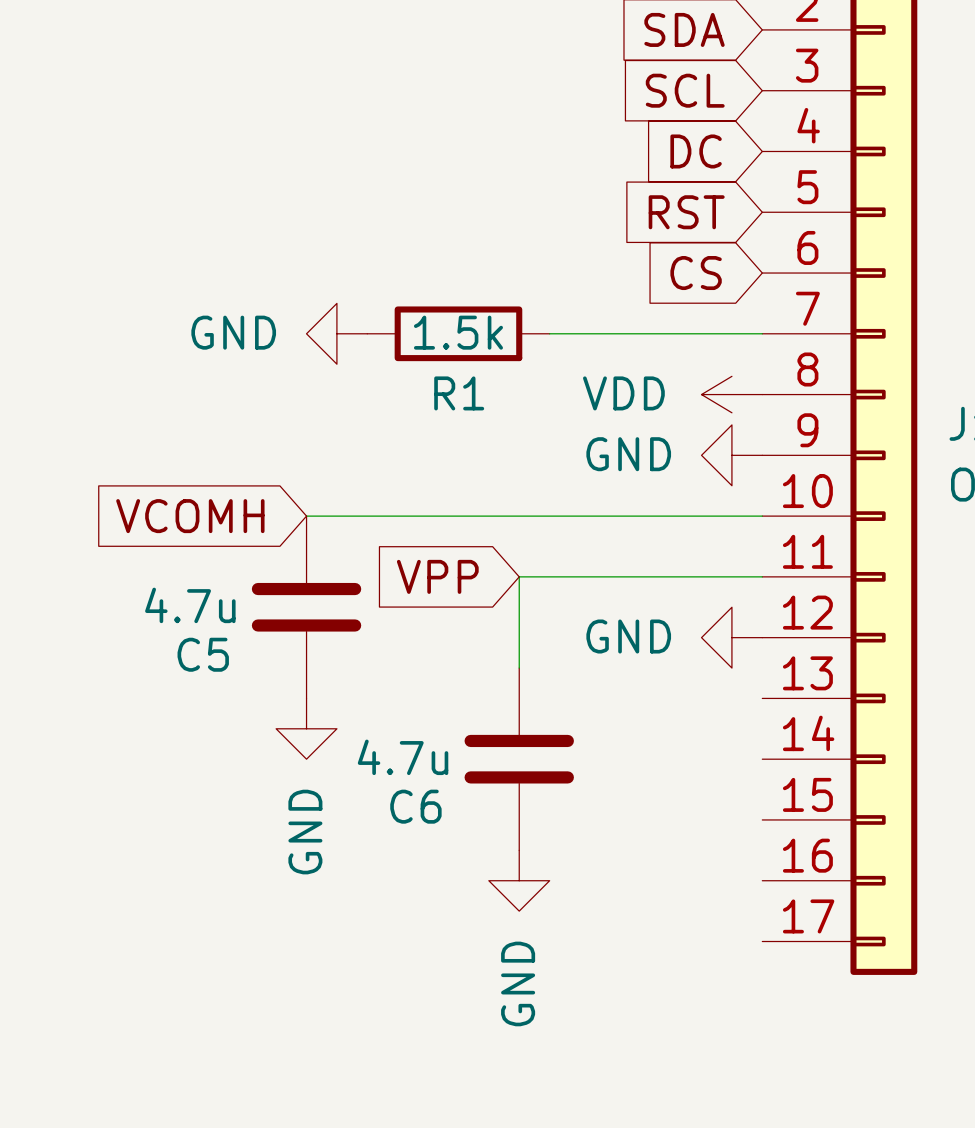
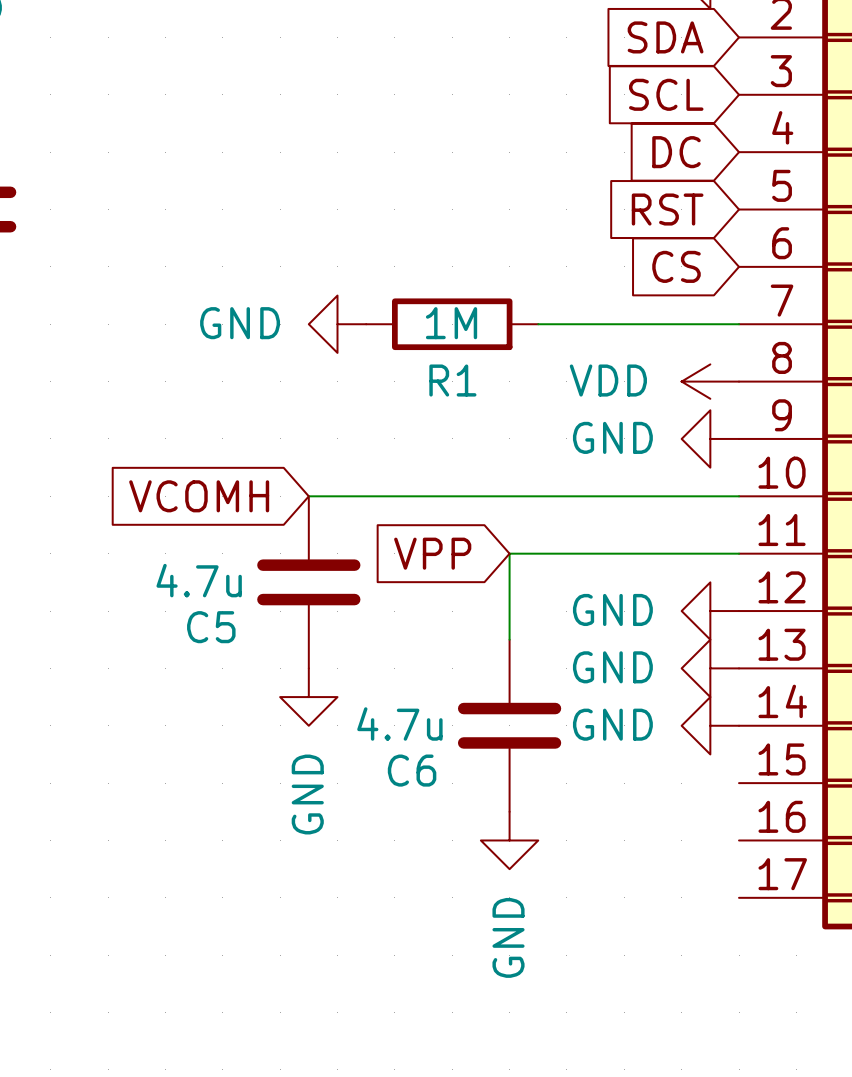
R1 value: 1.5k (458, 332) -> 1M (451, 323)
power symbol: none -> GND (710, 668)
power symbol: none -> GND (710, 725)

